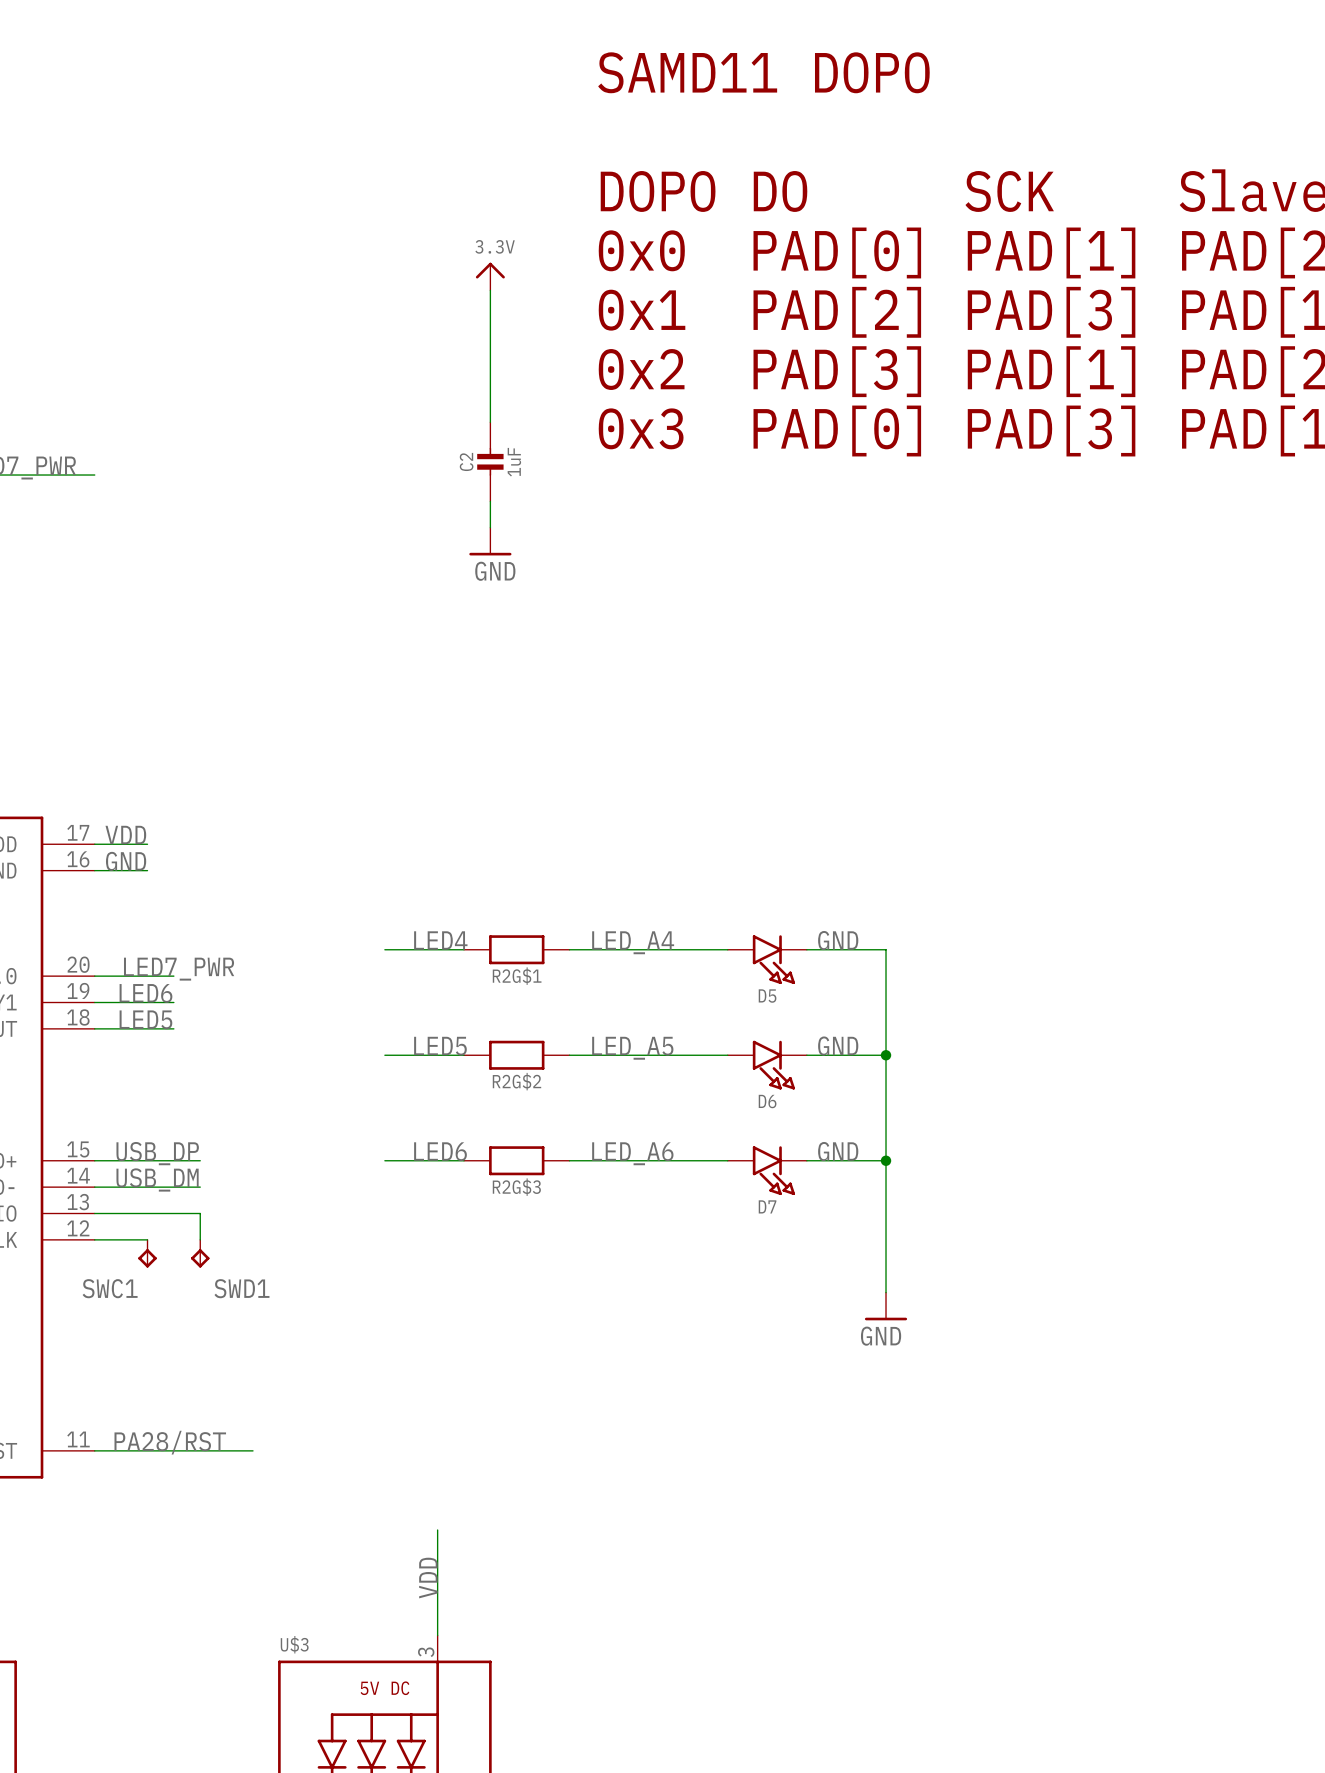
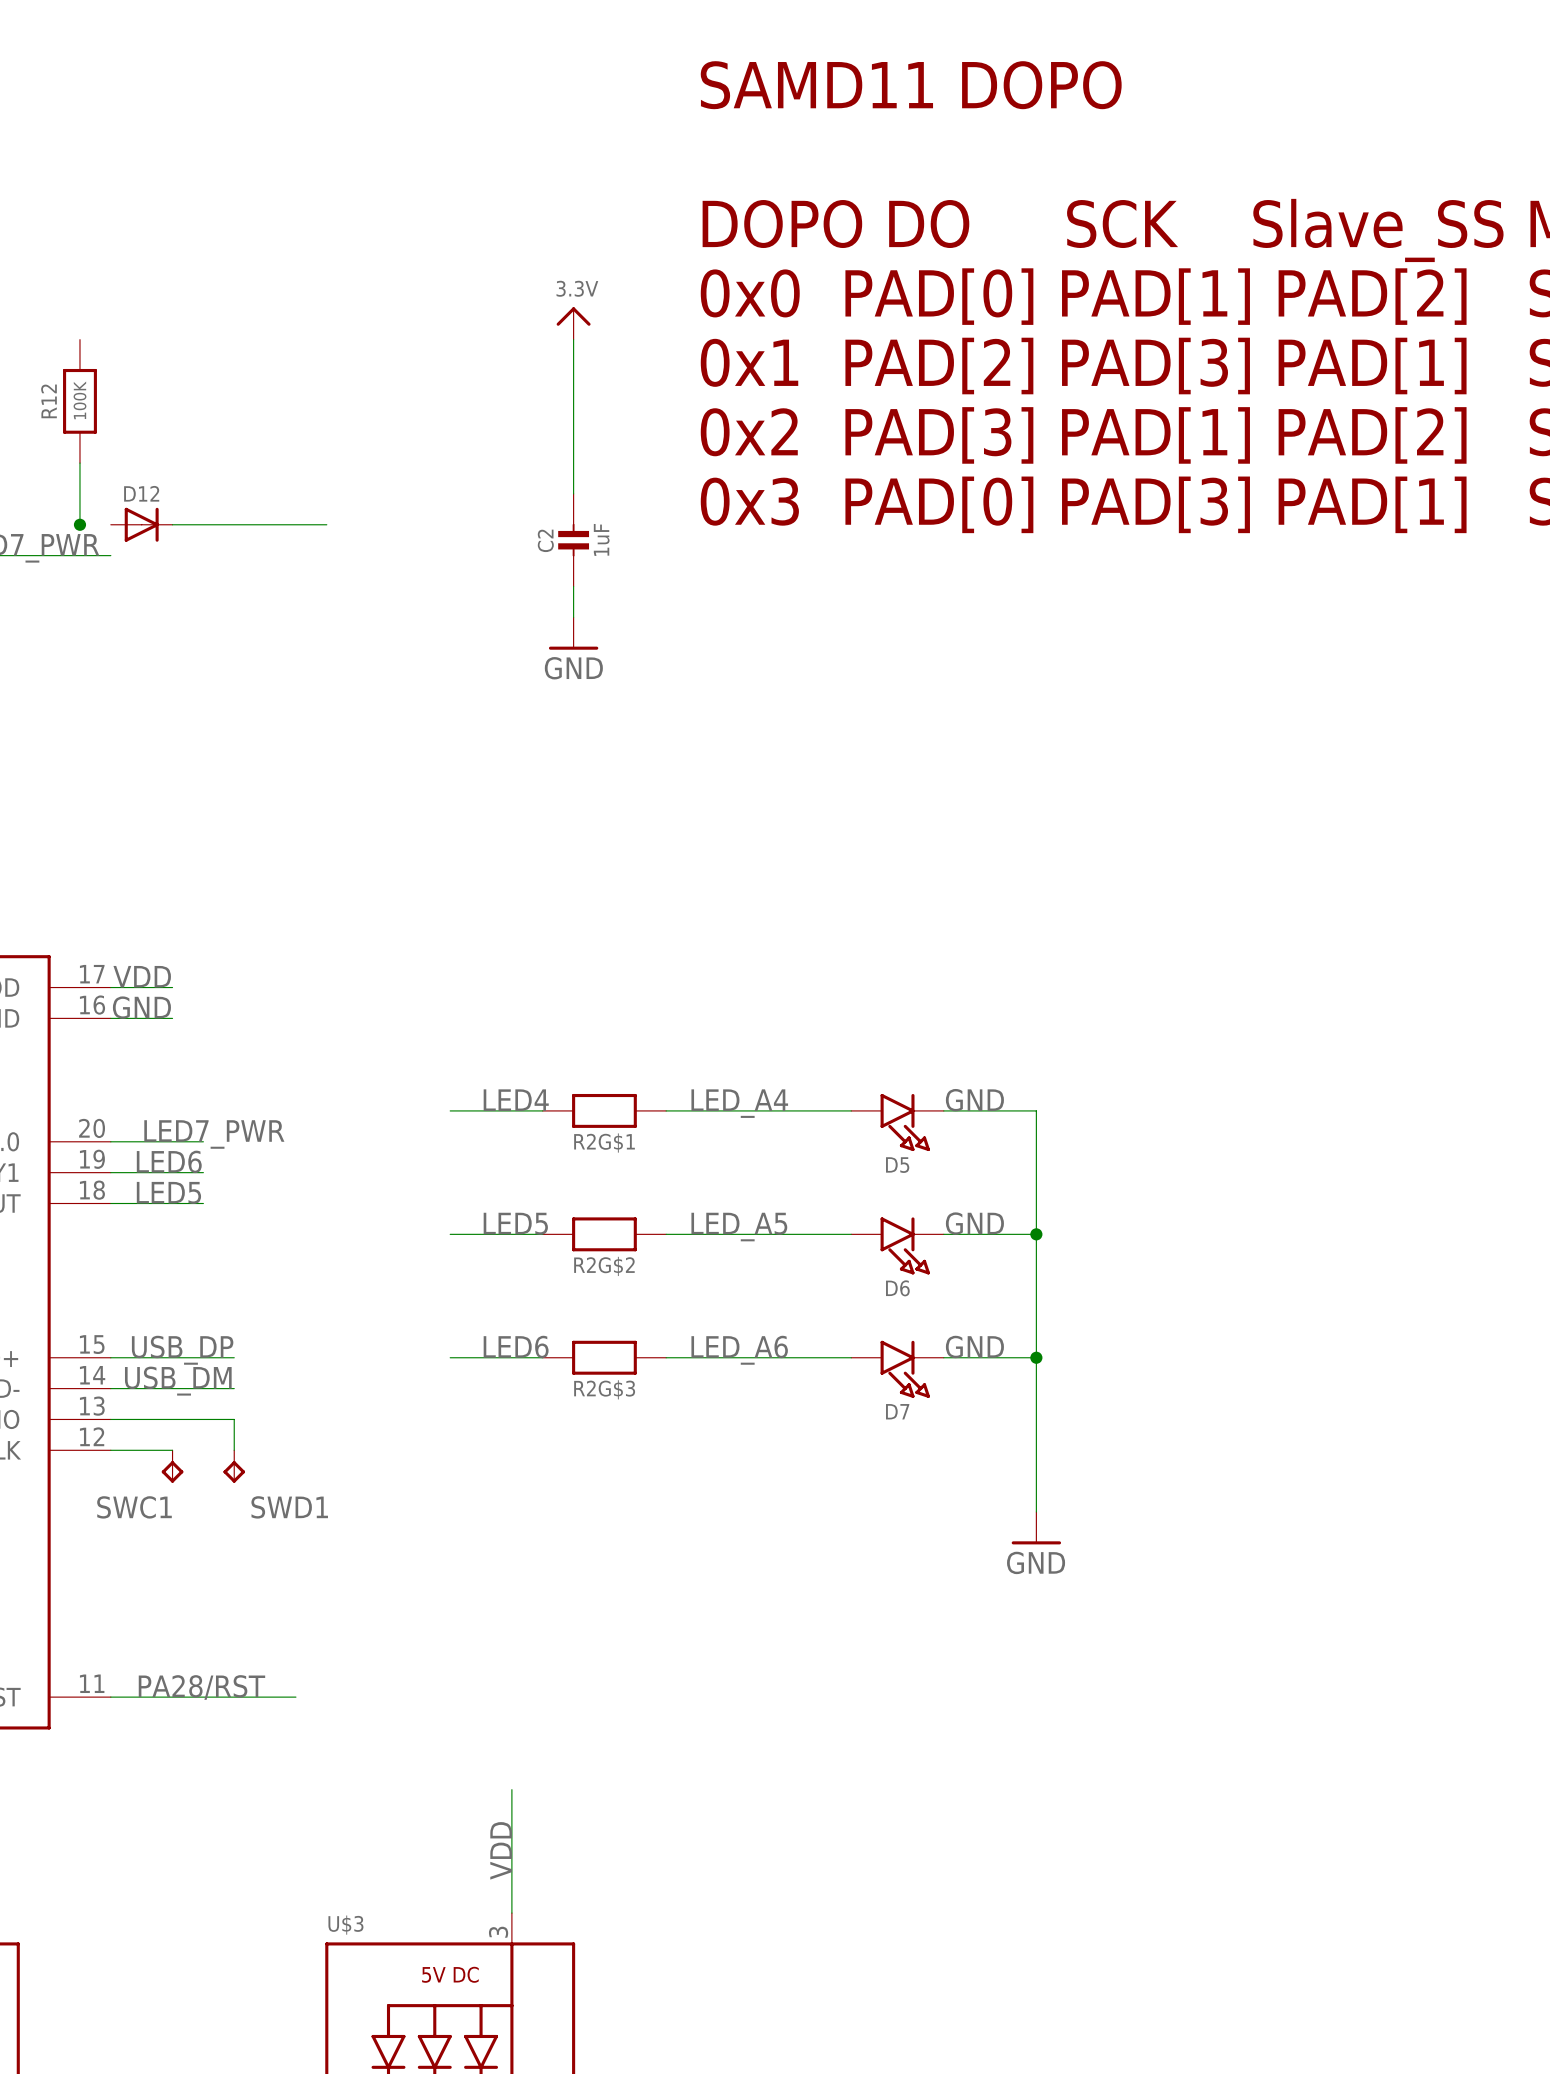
R12: none -> 100K (79, 401)
wire: none -> (79, 463) (79, 524)
junction: none -> (79, 524)
D12: none -> (141, 524)
wire: none -> (172, 524) (326, 524)

